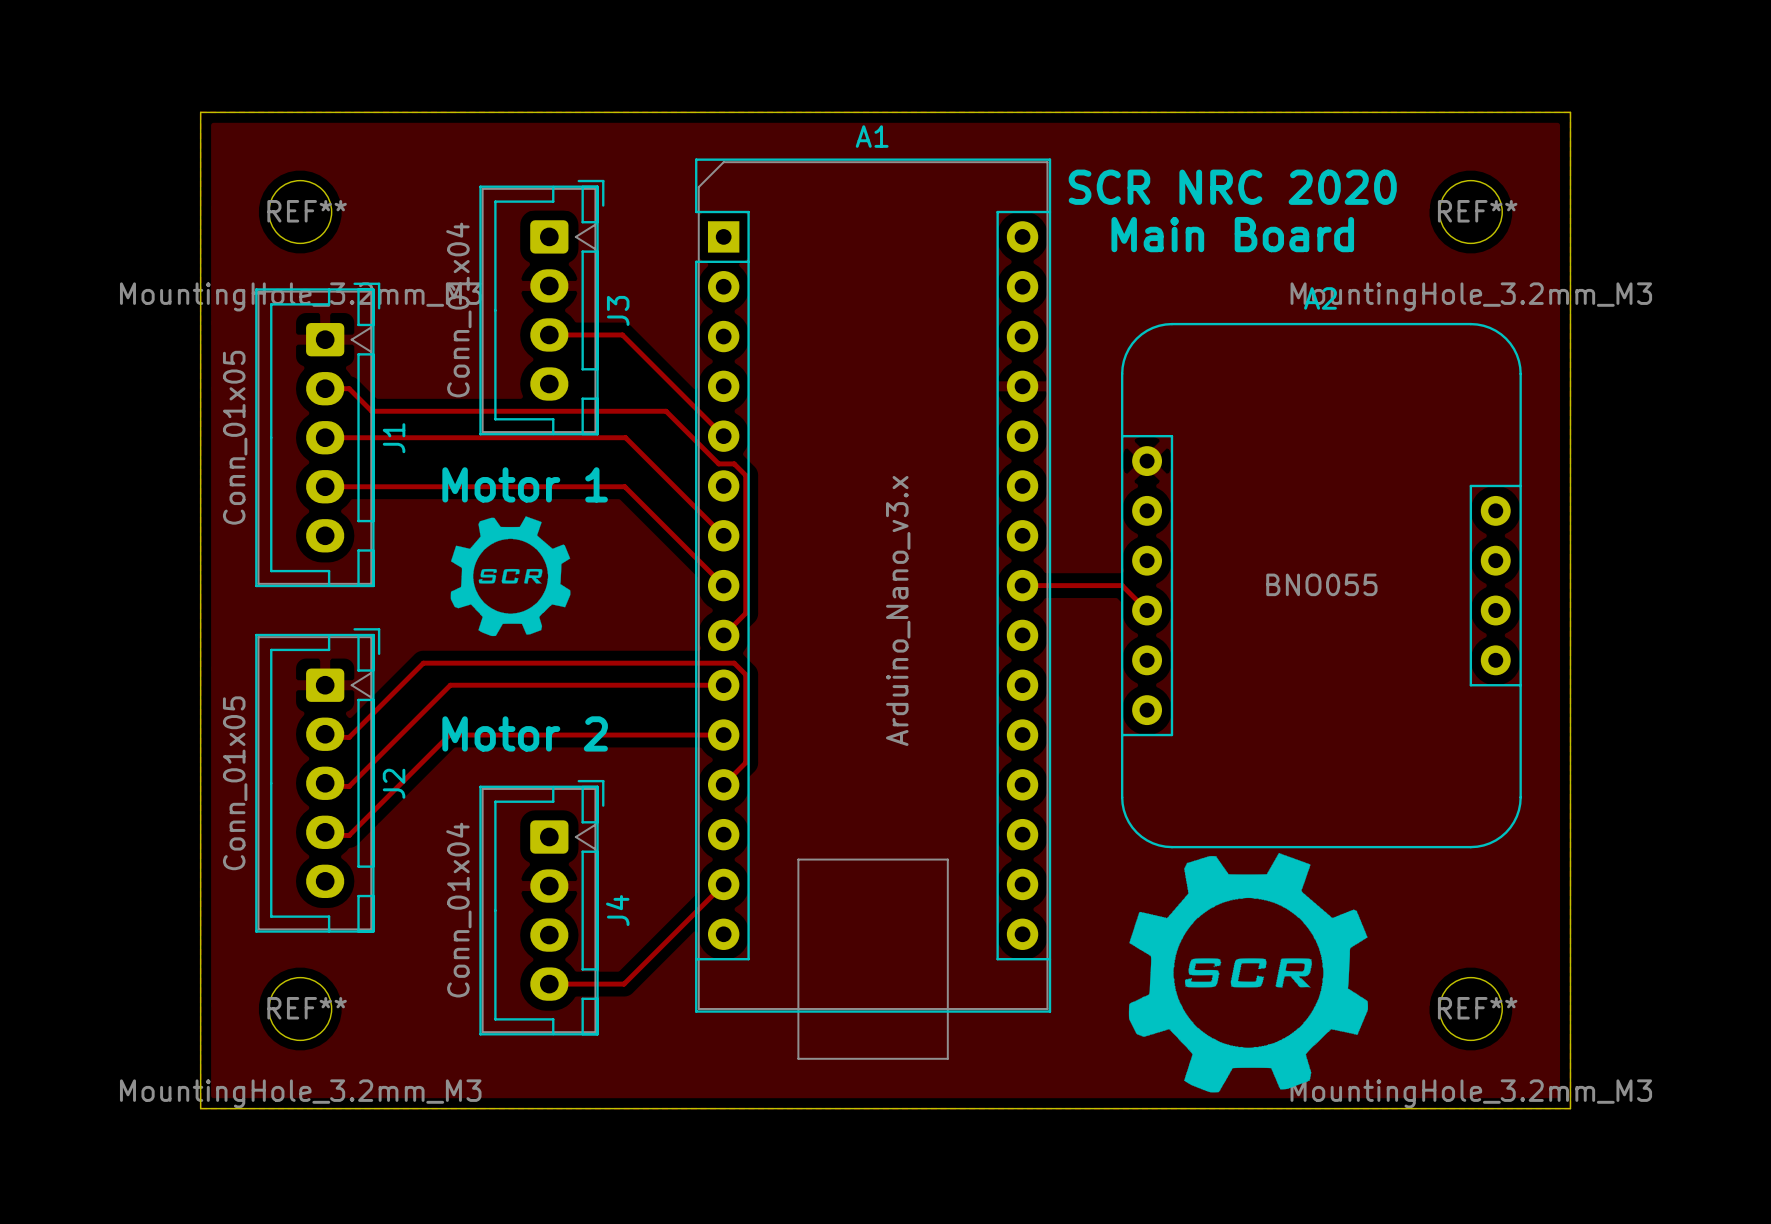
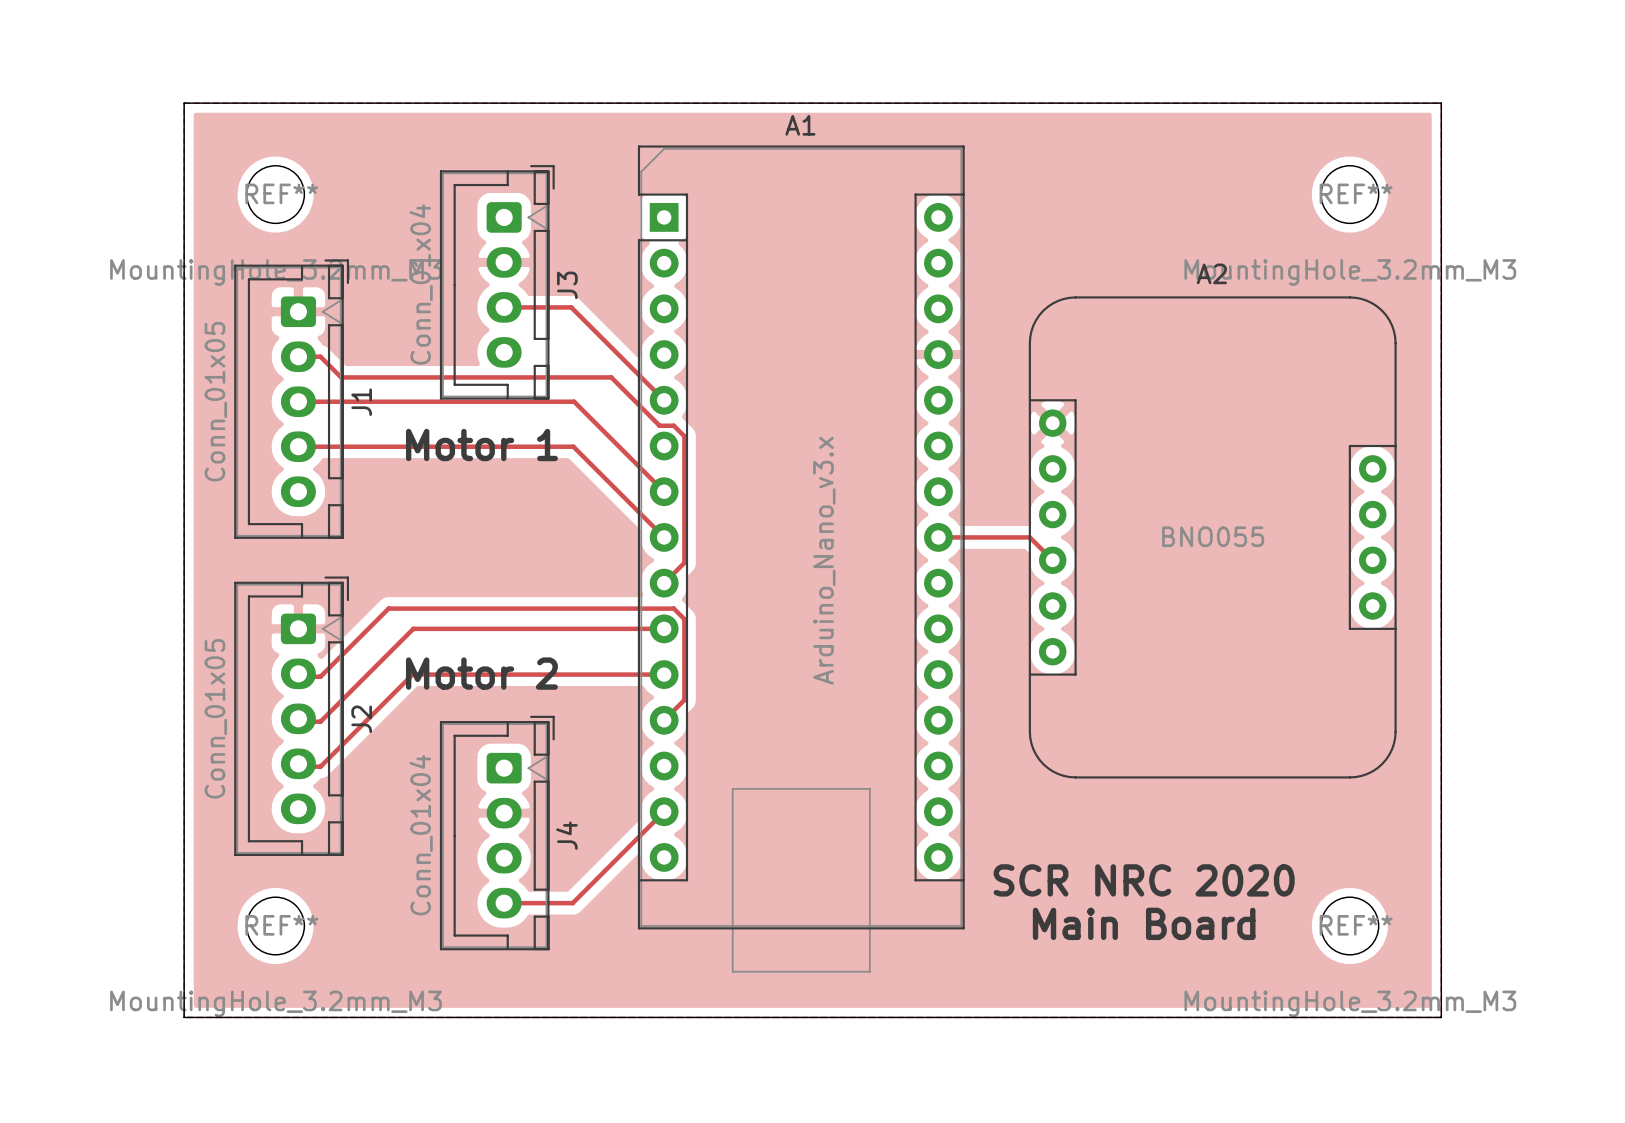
text: SCR NRC 2020 (1232, 187) -> none
text: Main Board (1232, 234) -> none
drawing: [450, 516, 571, 637] -> none
drawing: [1128, 852, 1369, 1093] -> none
text: none -> SCR NRC 2020 (1144, 880)
text: none -> Main Board (1144, 923)

